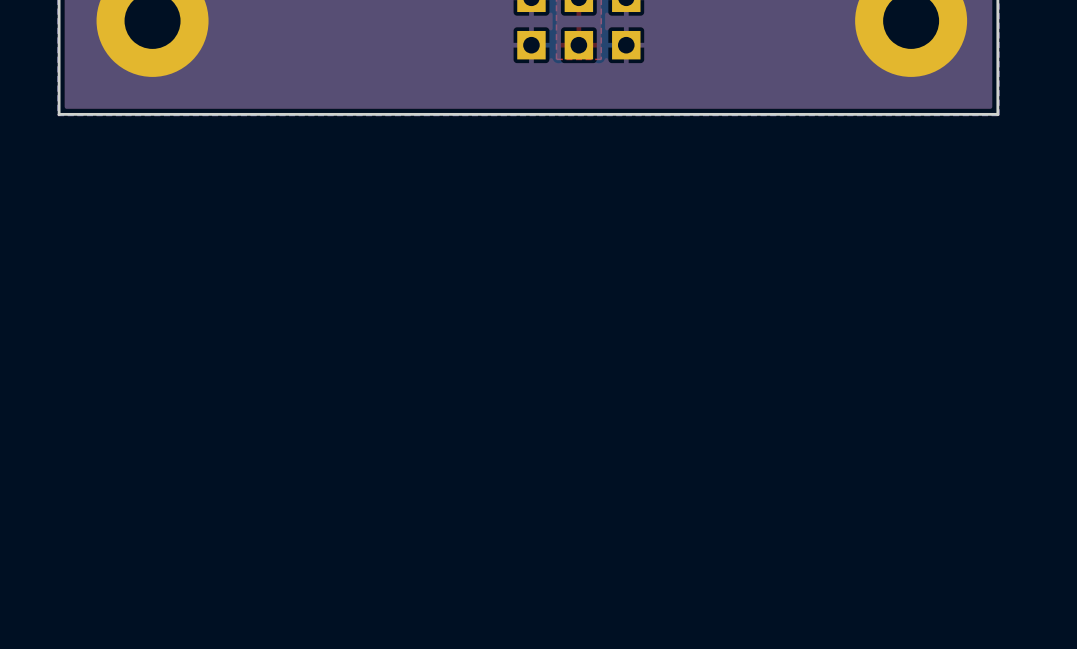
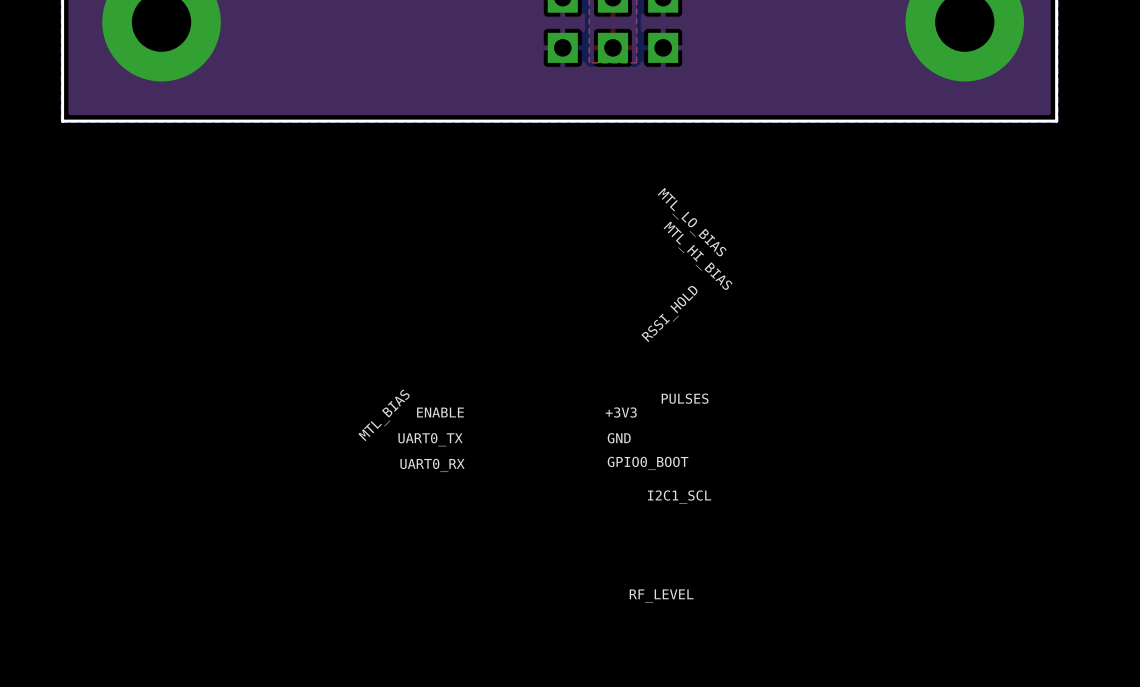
text: none -> MTL_LO_BIAS (692, 222)
text: none -> MTL_HI_BIAS (698, 255)
text: none -> RSSI_HOLD (669, 313)
text: none -> PULSES (685, 398)
text: none -> ENABLE (440, 412)
text: none -> +3V3 (621, 412)
text: none -> MTL_BIAS (384, 415)
text: none -> UART0_TX (430, 439)
text: none -> GND (619, 438)
text: none -> GPIO0_BOOT (648, 463)
text: none -> UART0_RX (432, 465)
text: none -> I2C1_SCL (679, 497)
text: none -> RF_LEVEL (661, 595)

